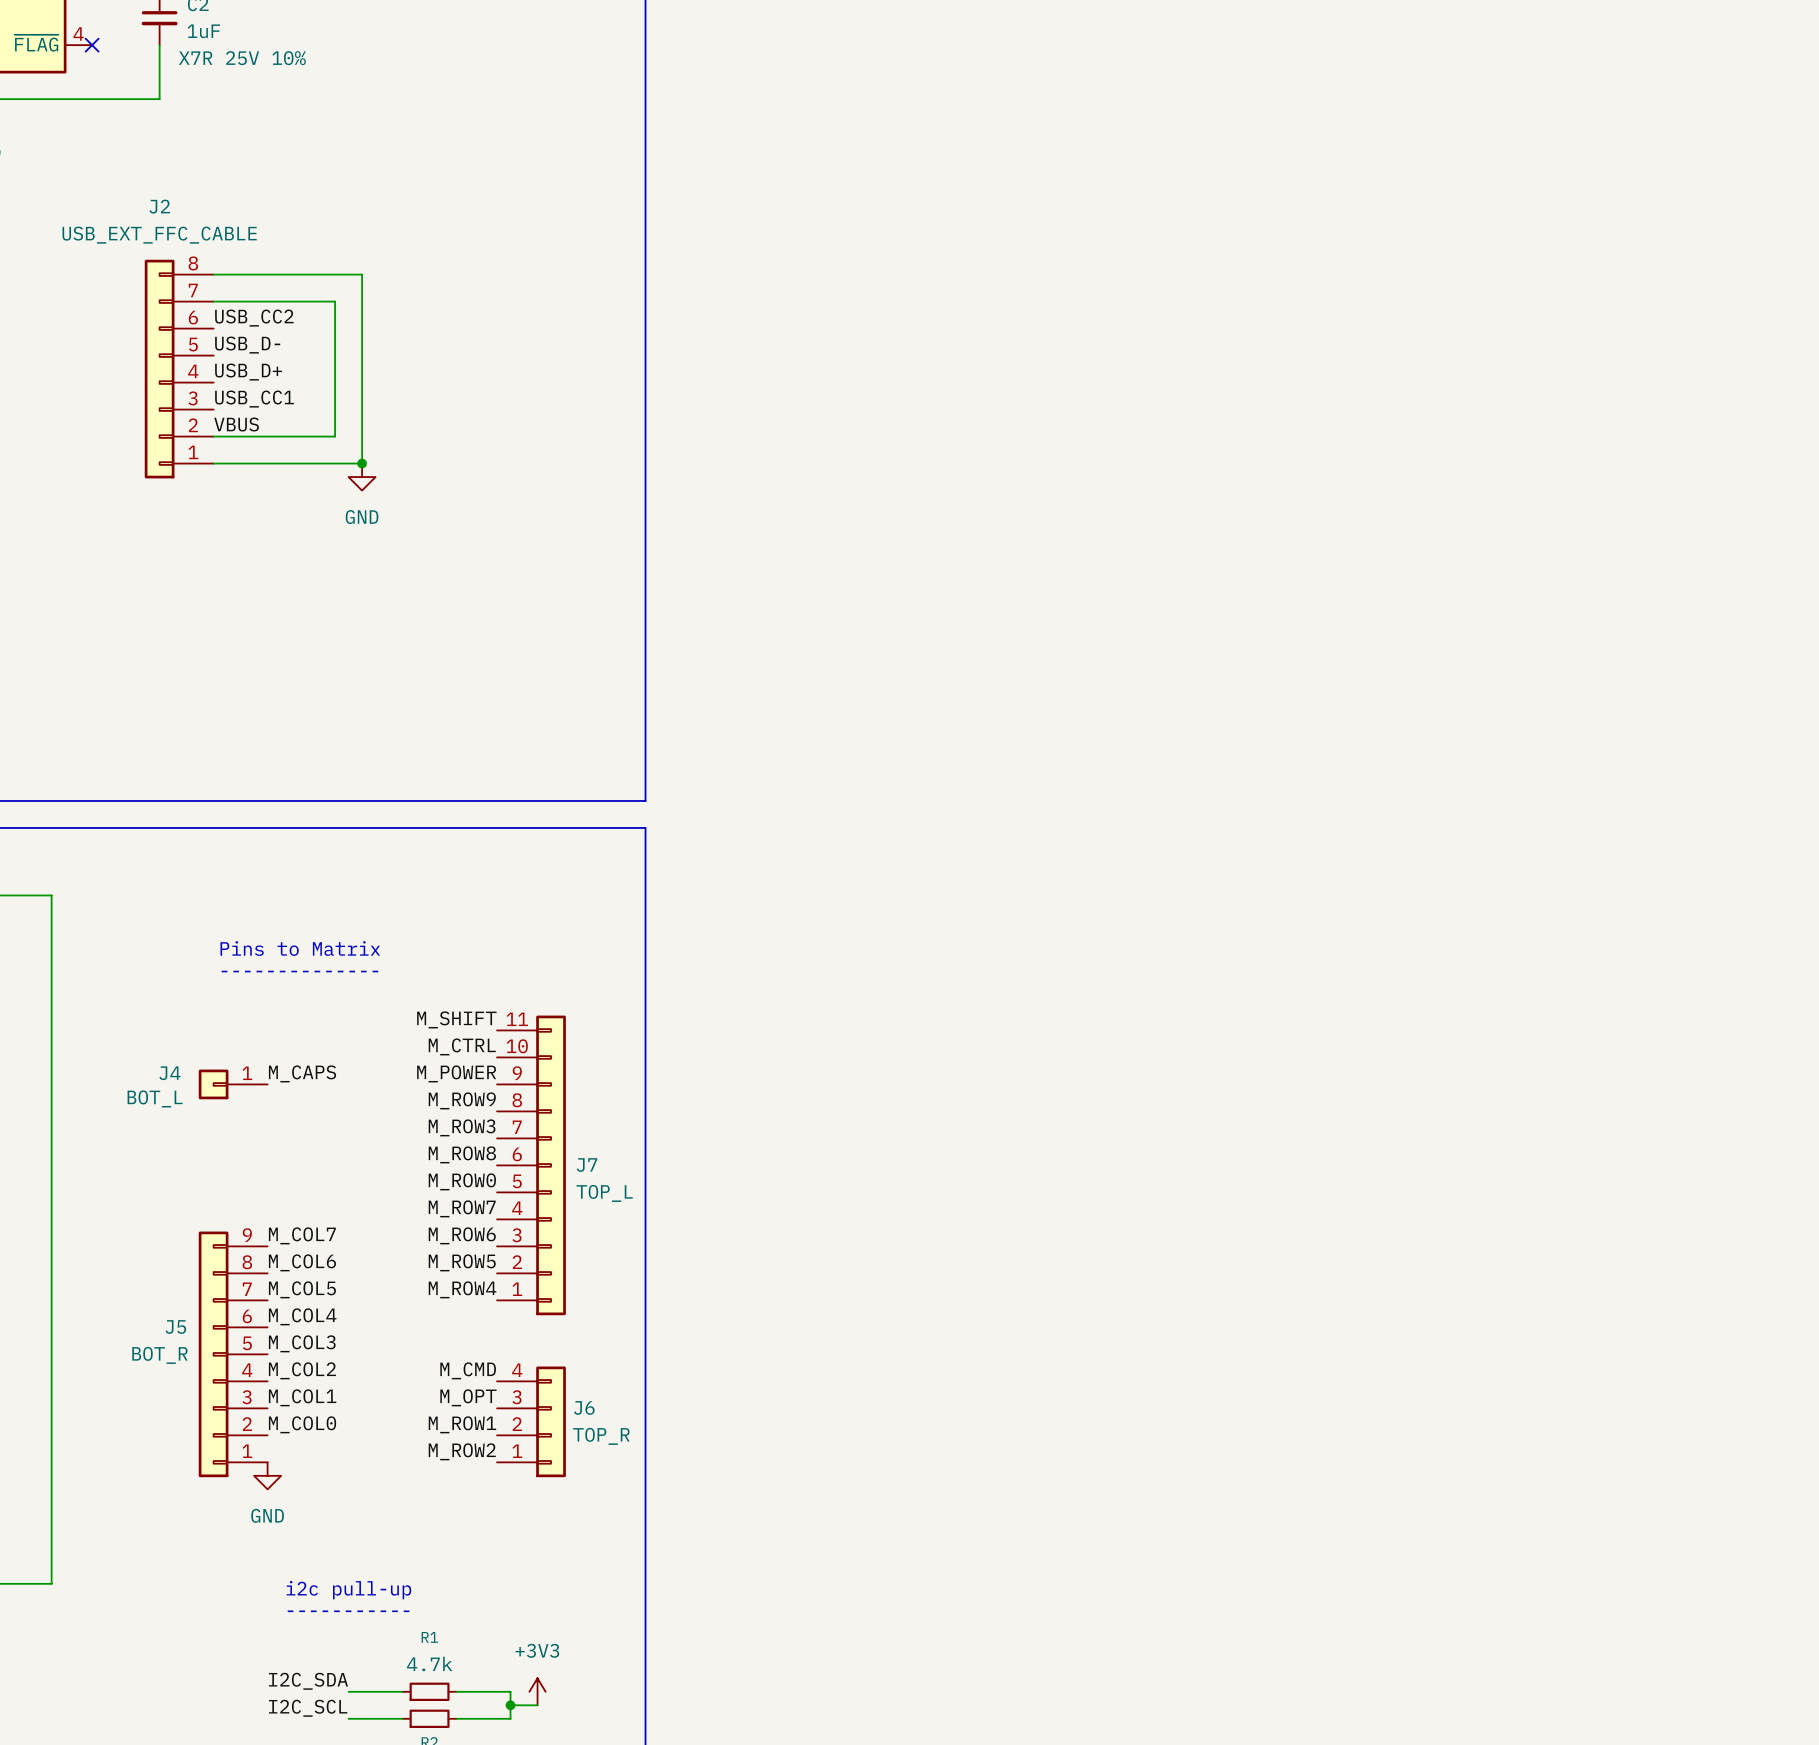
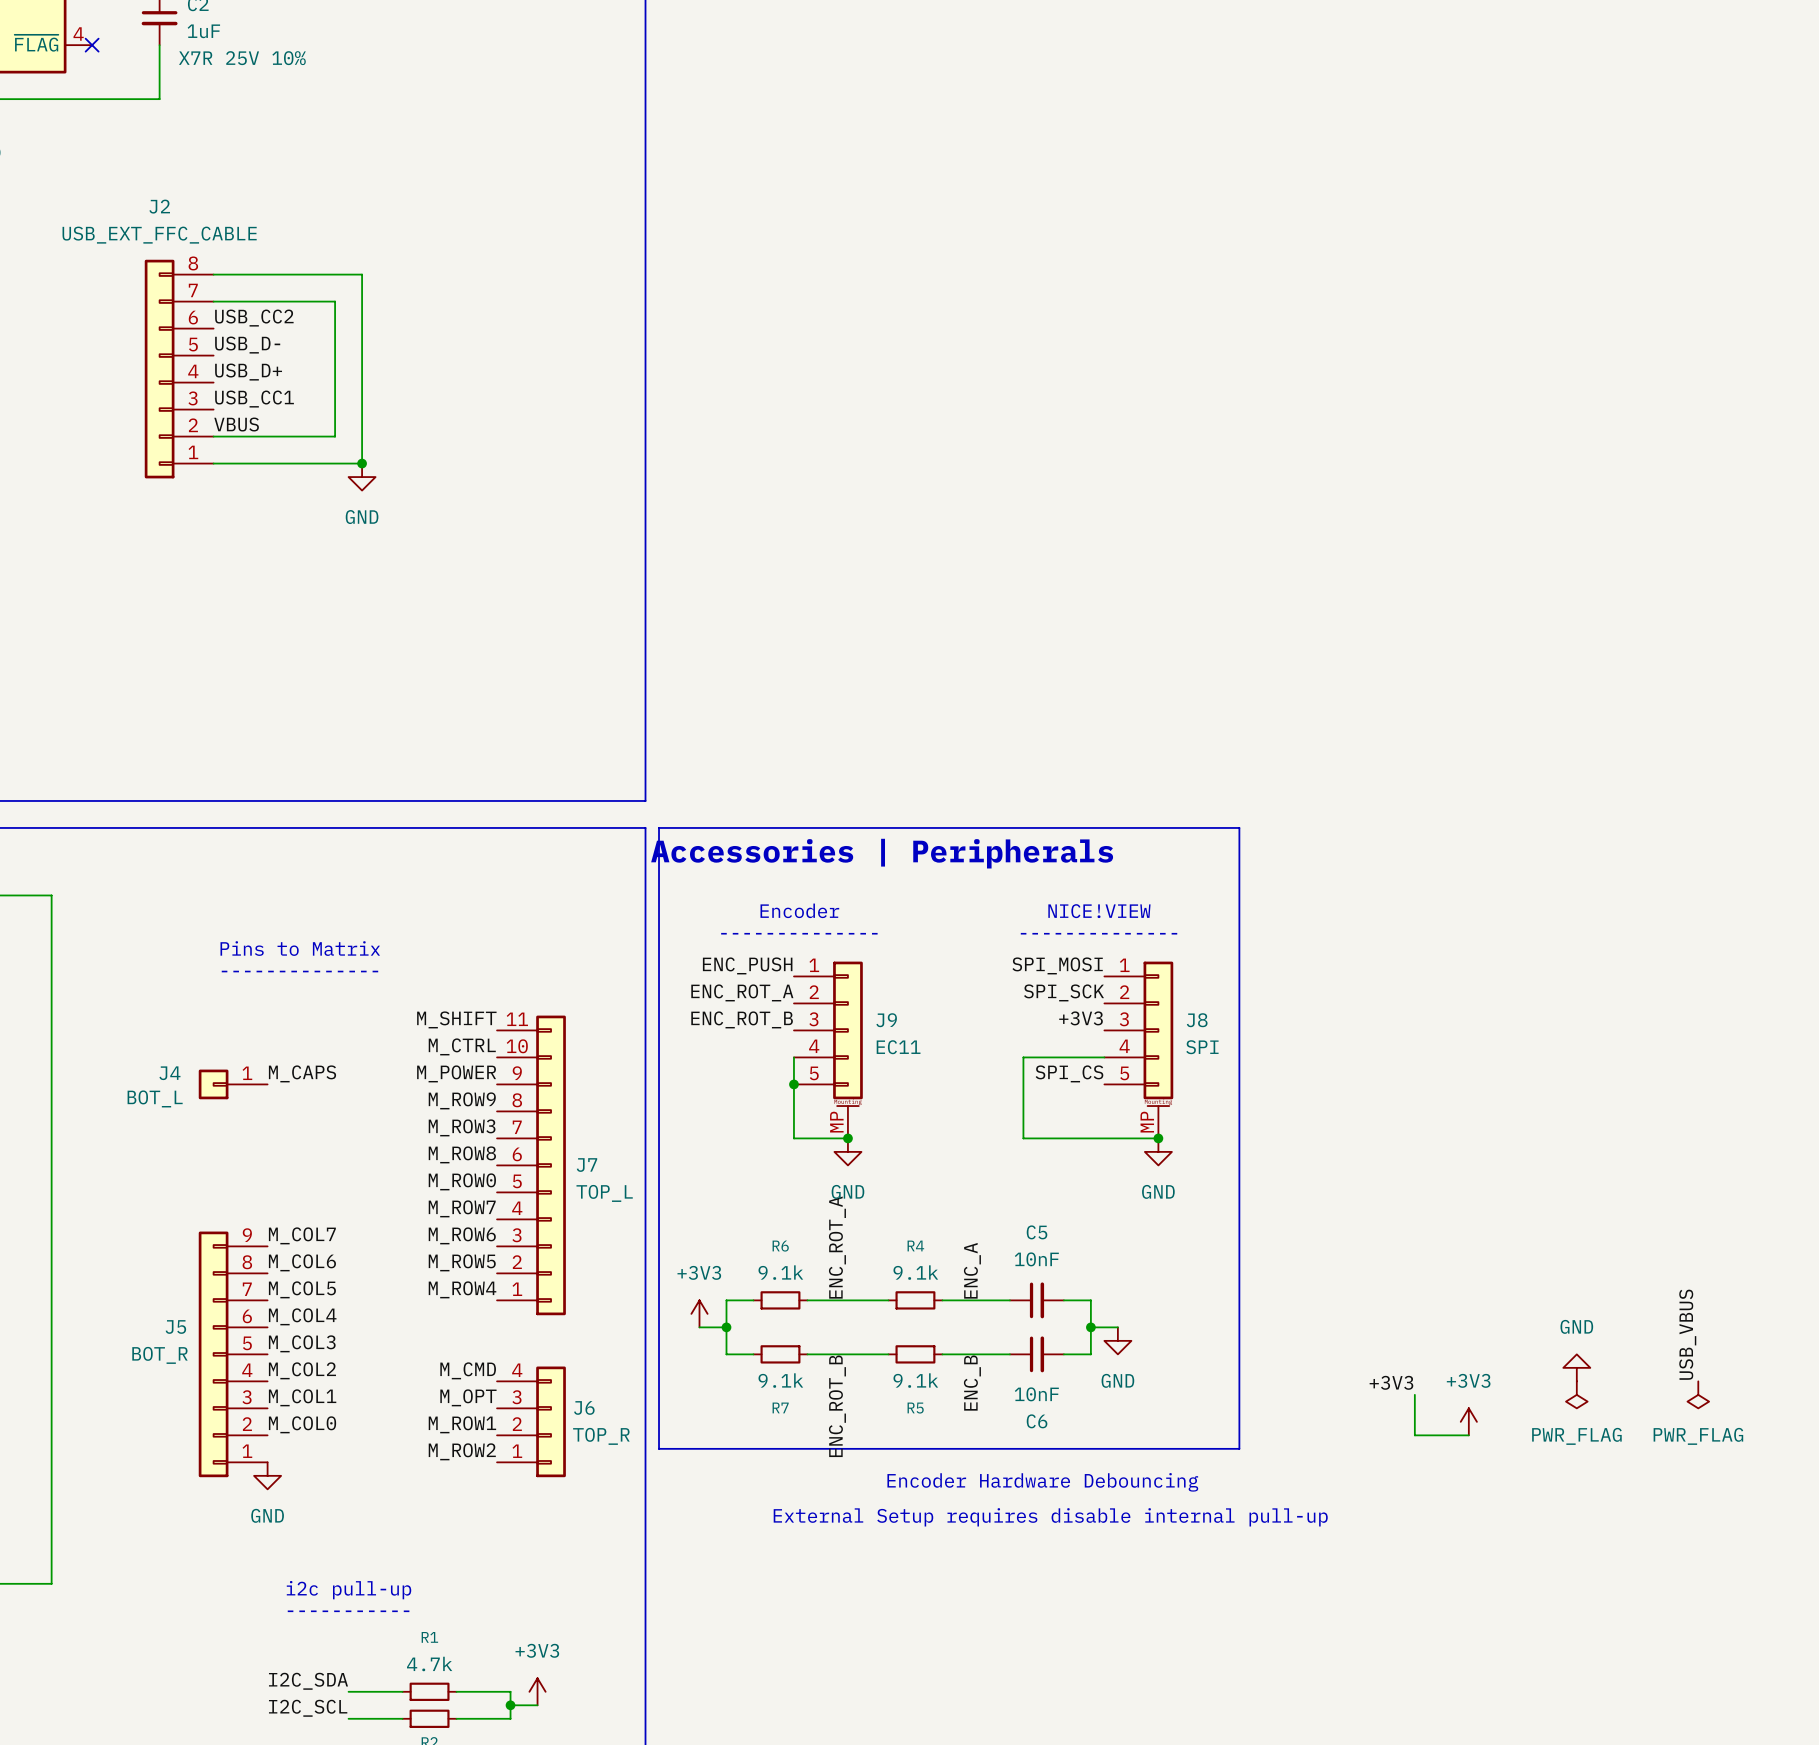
line: none -> (659, 827) (1239, 827) (1239, 1448) (659, 1448) (659, 827)
text: none -> Accessories | Peripherals (882, 853)
text: none -> Encoder (799, 910)
text: none -> NICE!VIEW (1099, 911)
text: none -> -------------- (799, 933)
text: none -> -------------- (1099, 933)
label: none -> ENC_PUSH (747, 965)
label: none -> SPI_MOSI (1057, 965)
label: none -> ENC_ROT_A (742, 992)
label: none -> SPI_SCK (1064, 992)
label: none -> +3V3 (1081, 1018)
label: none -> ENC_ROT_B (742, 1019)
J9: none -> EC11 (828, 1050)
J8: none -> SPI (1138, 1050)
wire: none -> (793, 1057) (793, 1138) (847, 1138)
wire: none -> (1104, 1057) (1023, 1057) (1023, 1138) (1158, 1138)
label: none -> SPI_CS (1069, 1073)
junction: none -> (793, 1084)
junction: none -> (847, 1138)
junction: none -> (1158, 1138)
power symbol: none -> GND (847, 1151)
power symbol: none -> GND (1158, 1151)
label: none -> ENC_ROT_A (837, 1247)
label: none -> ENC_A (972, 1270)
wire: none -> (753, 1300) (726, 1300) (726, 1354) (753, 1354)
R6: none -> 9.1k (780, 1300)
wire: none -> (807, 1300) (888, 1300)
R4: none -> 9.1k (915, 1300)
wire: none -> (942, 1300) (1009, 1300)
C5: none -> 10nF (1036, 1300)
wire: none -> (1063, 1300) (1090, 1300) (1090, 1354) (1063, 1354)
power symbol: none -> +3V3 (699, 1313)
wire: none -> (699, 1327) (726, 1327)
junction: none -> (726, 1327)
wire: none -> (1090, 1327) (1117, 1327)
junction: none -> (1090, 1327)
label: none -> USB_VBUS (1687, 1334)
power symbol: none -> GND (1117, 1340)
R7: none -> 9.1k (780, 1354)
wire: none -> (807, 1354) (888, 1354)
R5: none -> 9.1k (915, 1354)
wire: none -> (942, 1354) (1009, 1354)
C6: none -> 10nF (1036, 1354)
power symbol: none -> GND (1576, 1367)
label: none -> +3V3 (1391, 1382)
label: none -> ENC_B (972, 1383)
wire: none -> (1414, 1394) (1414, 1435) (1468, 1435)
power symbol: none -> PWR_FLAG (1576, 1394)
power symbol: none -> PWR_FLAG (1698, 1394)
label: none -> ENC_ROT_B (837, 1406)
power symbol: none -> +3V3 (1468, 1421)
text: none -> Encoder Hardware Debouncing (1042, 1482)
text: none -> External Setup requires disable internal pull-up (1050, 1517)

